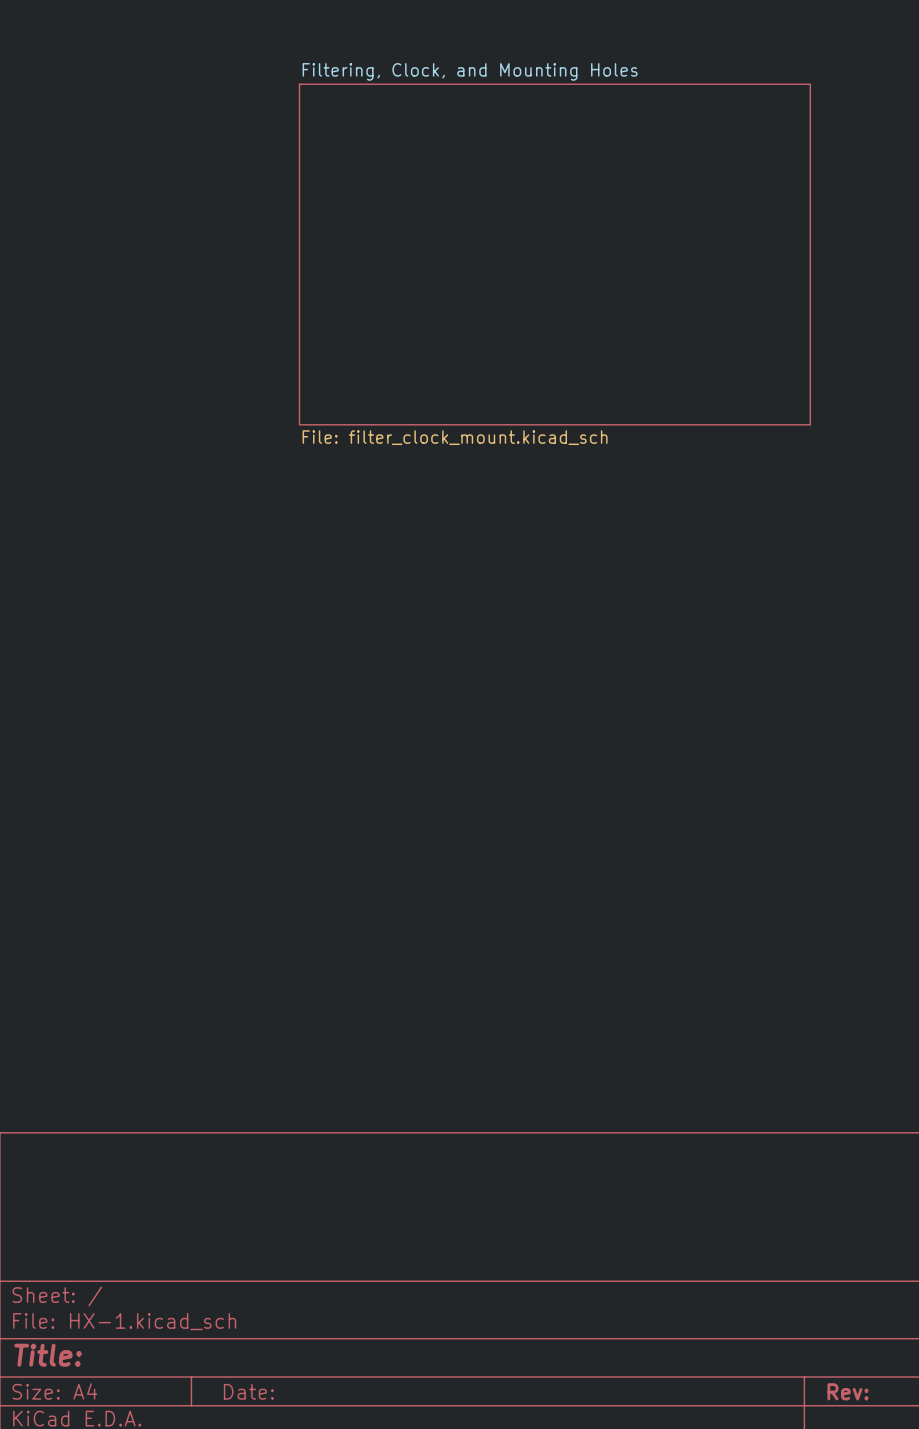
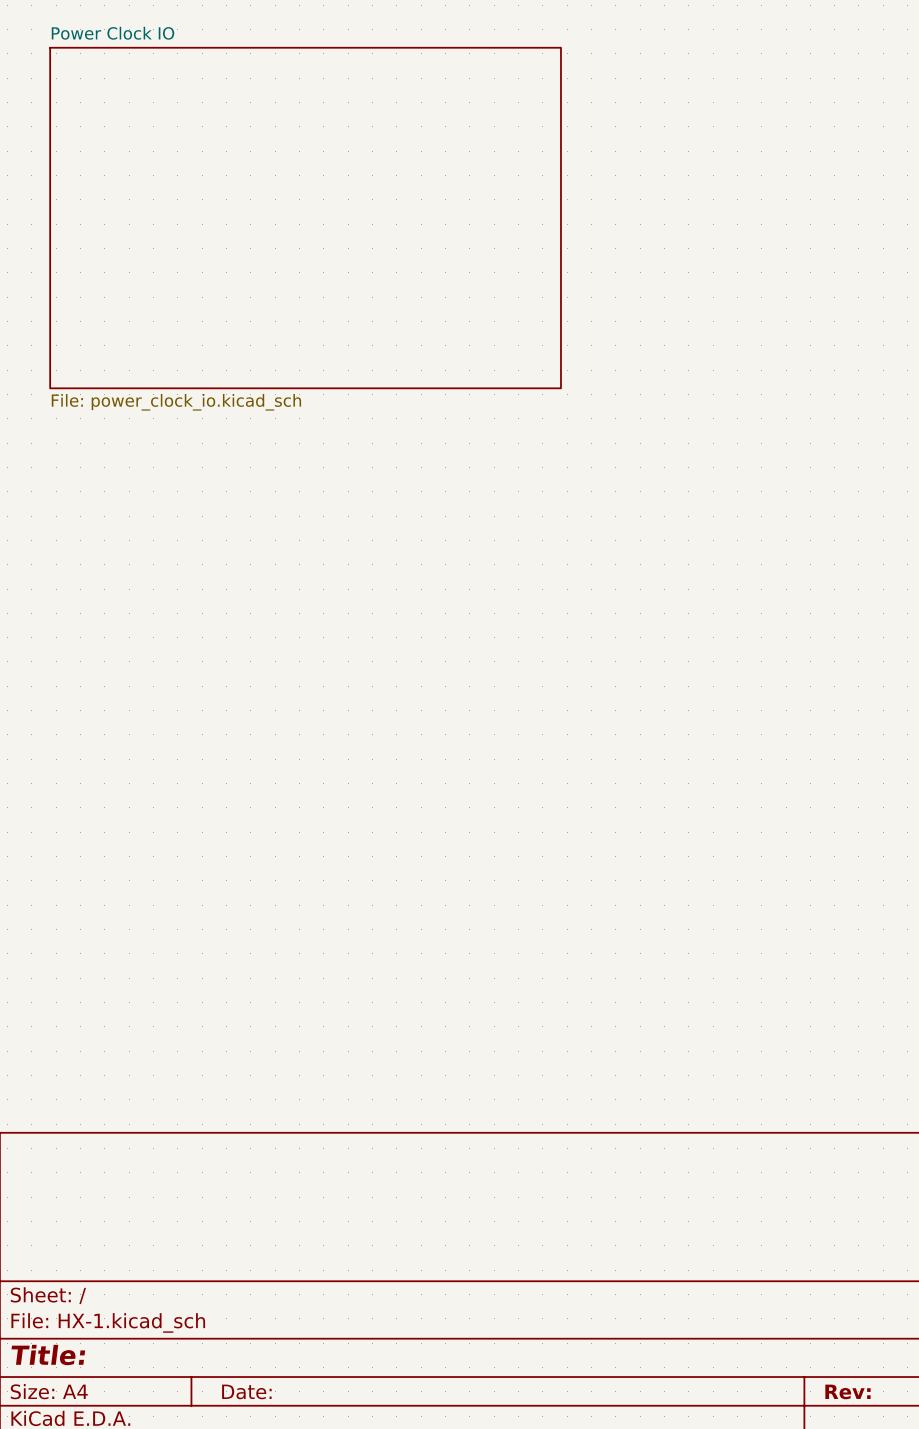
sheet Power Clock IO: none -> File: power_clock_io.kicad_sch (305, 218)
sheet Filtering, Clock, and Mounting Holes: File: filter_clock_mount.kicad_sch (554, 254) -> none

